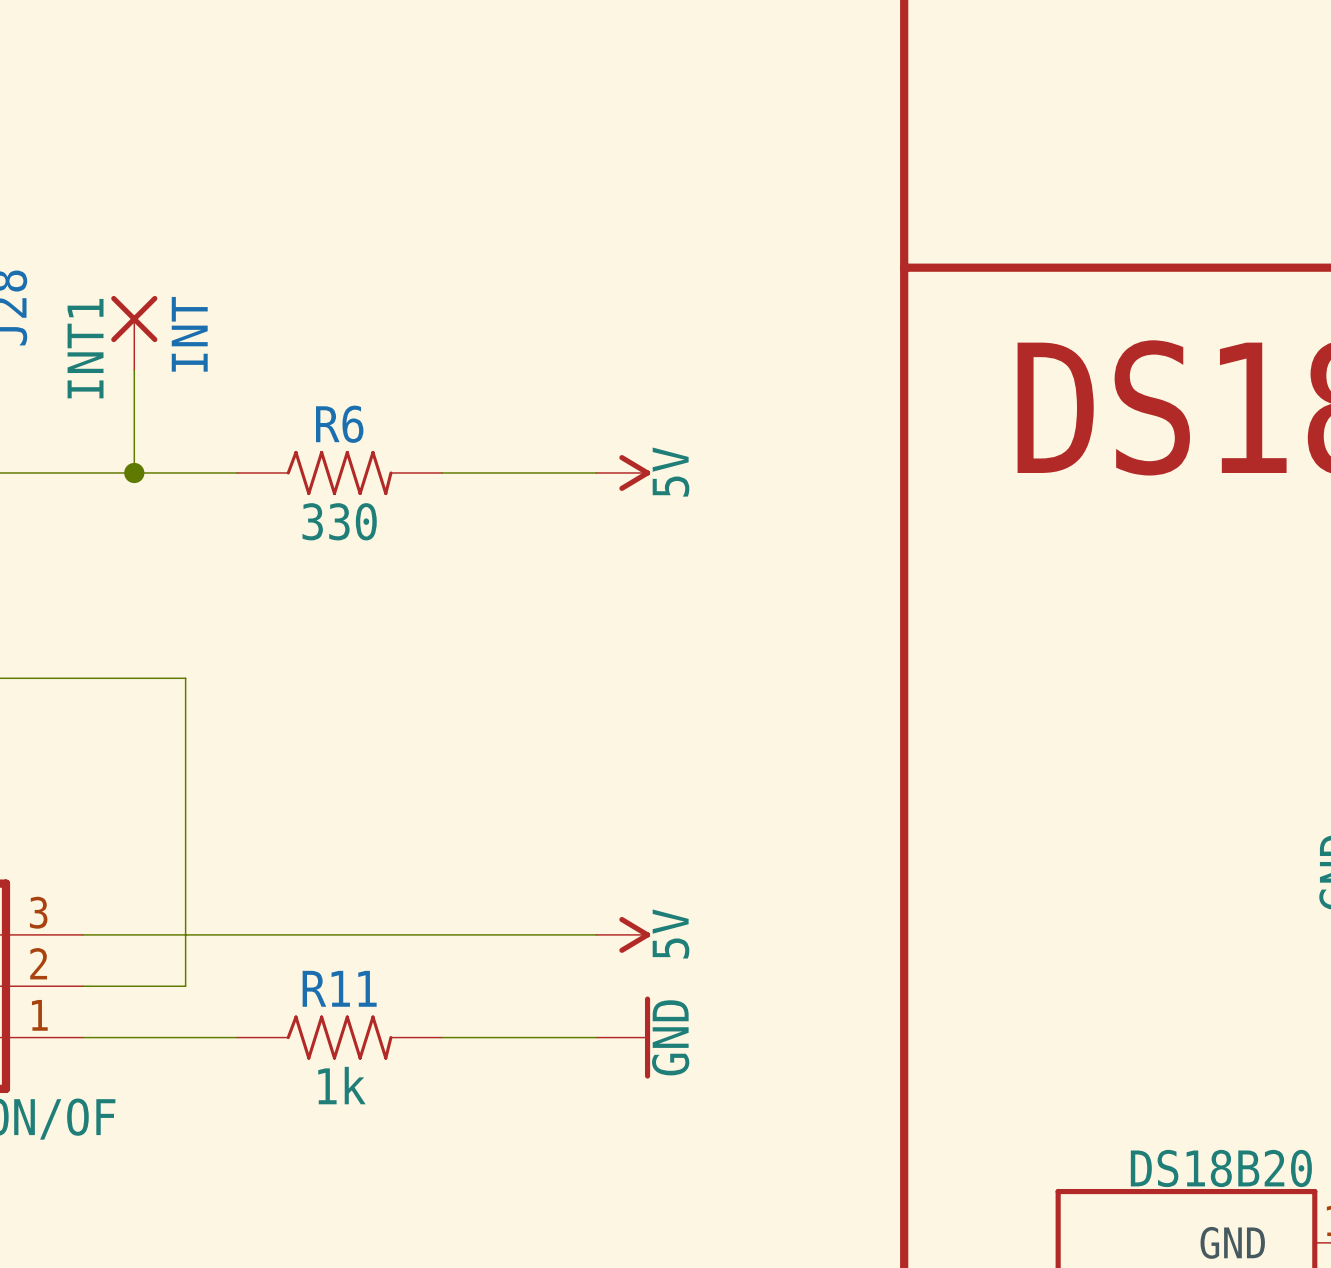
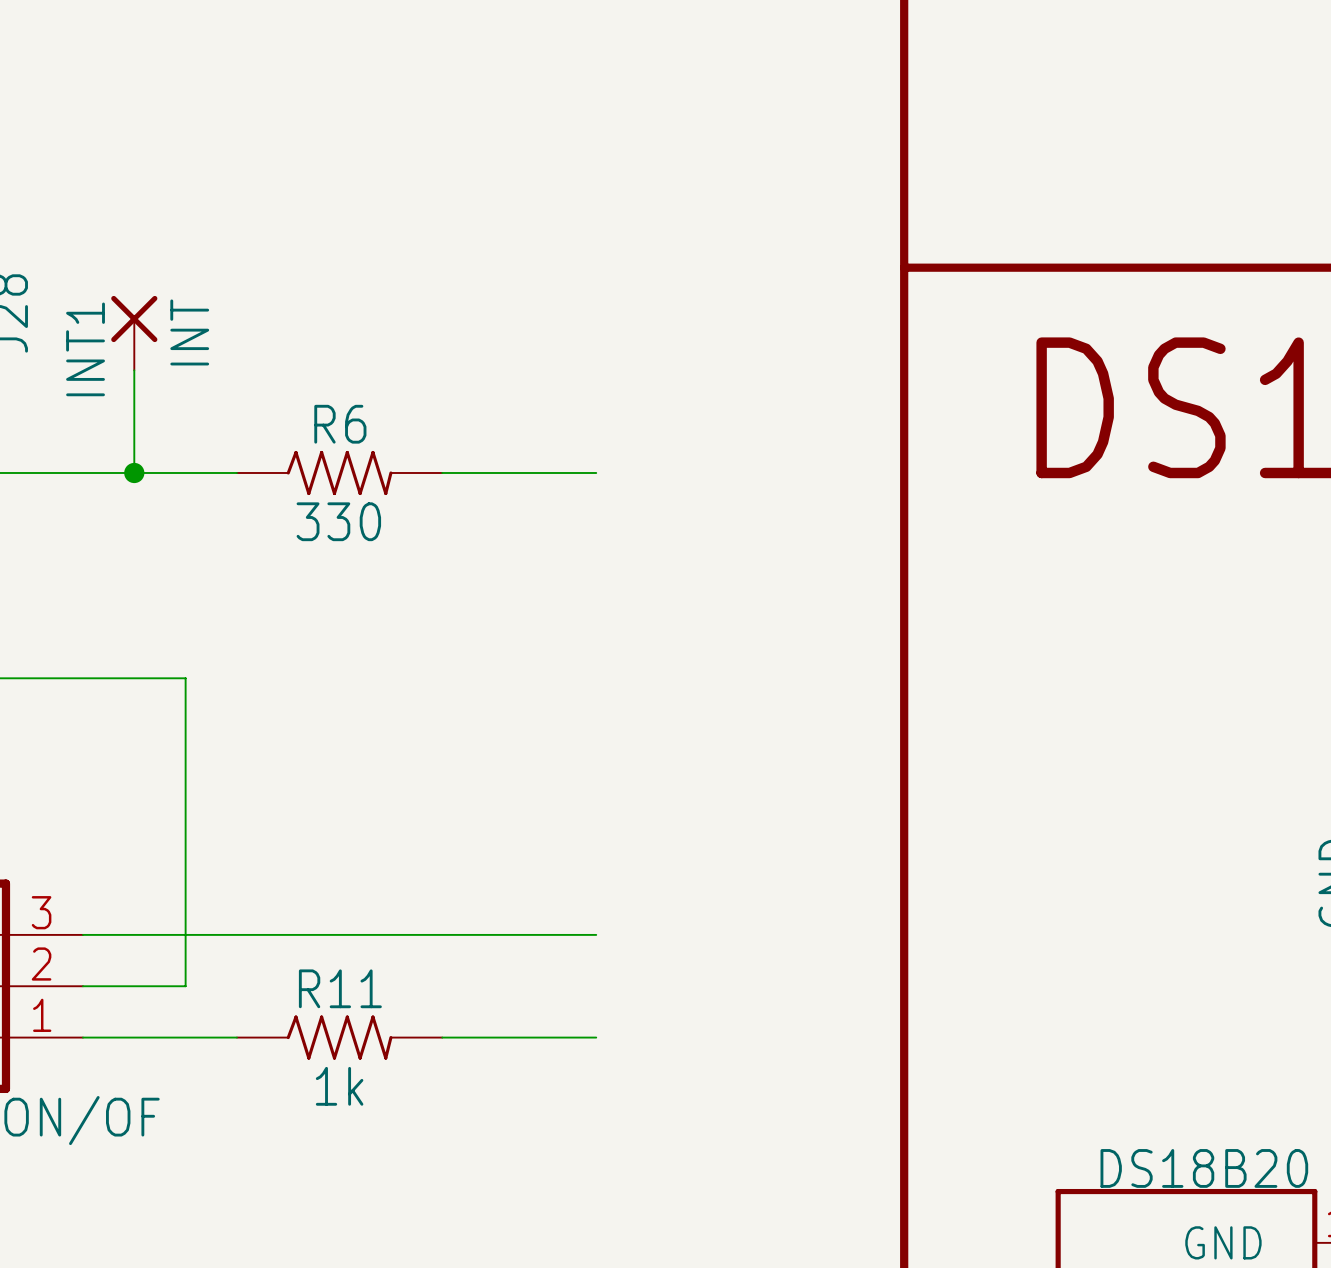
power symbol: 5V (623, 472) -> none
power symbol: 5V (623, 934) -> none
power symbol: GND (623, 1037) -> none

